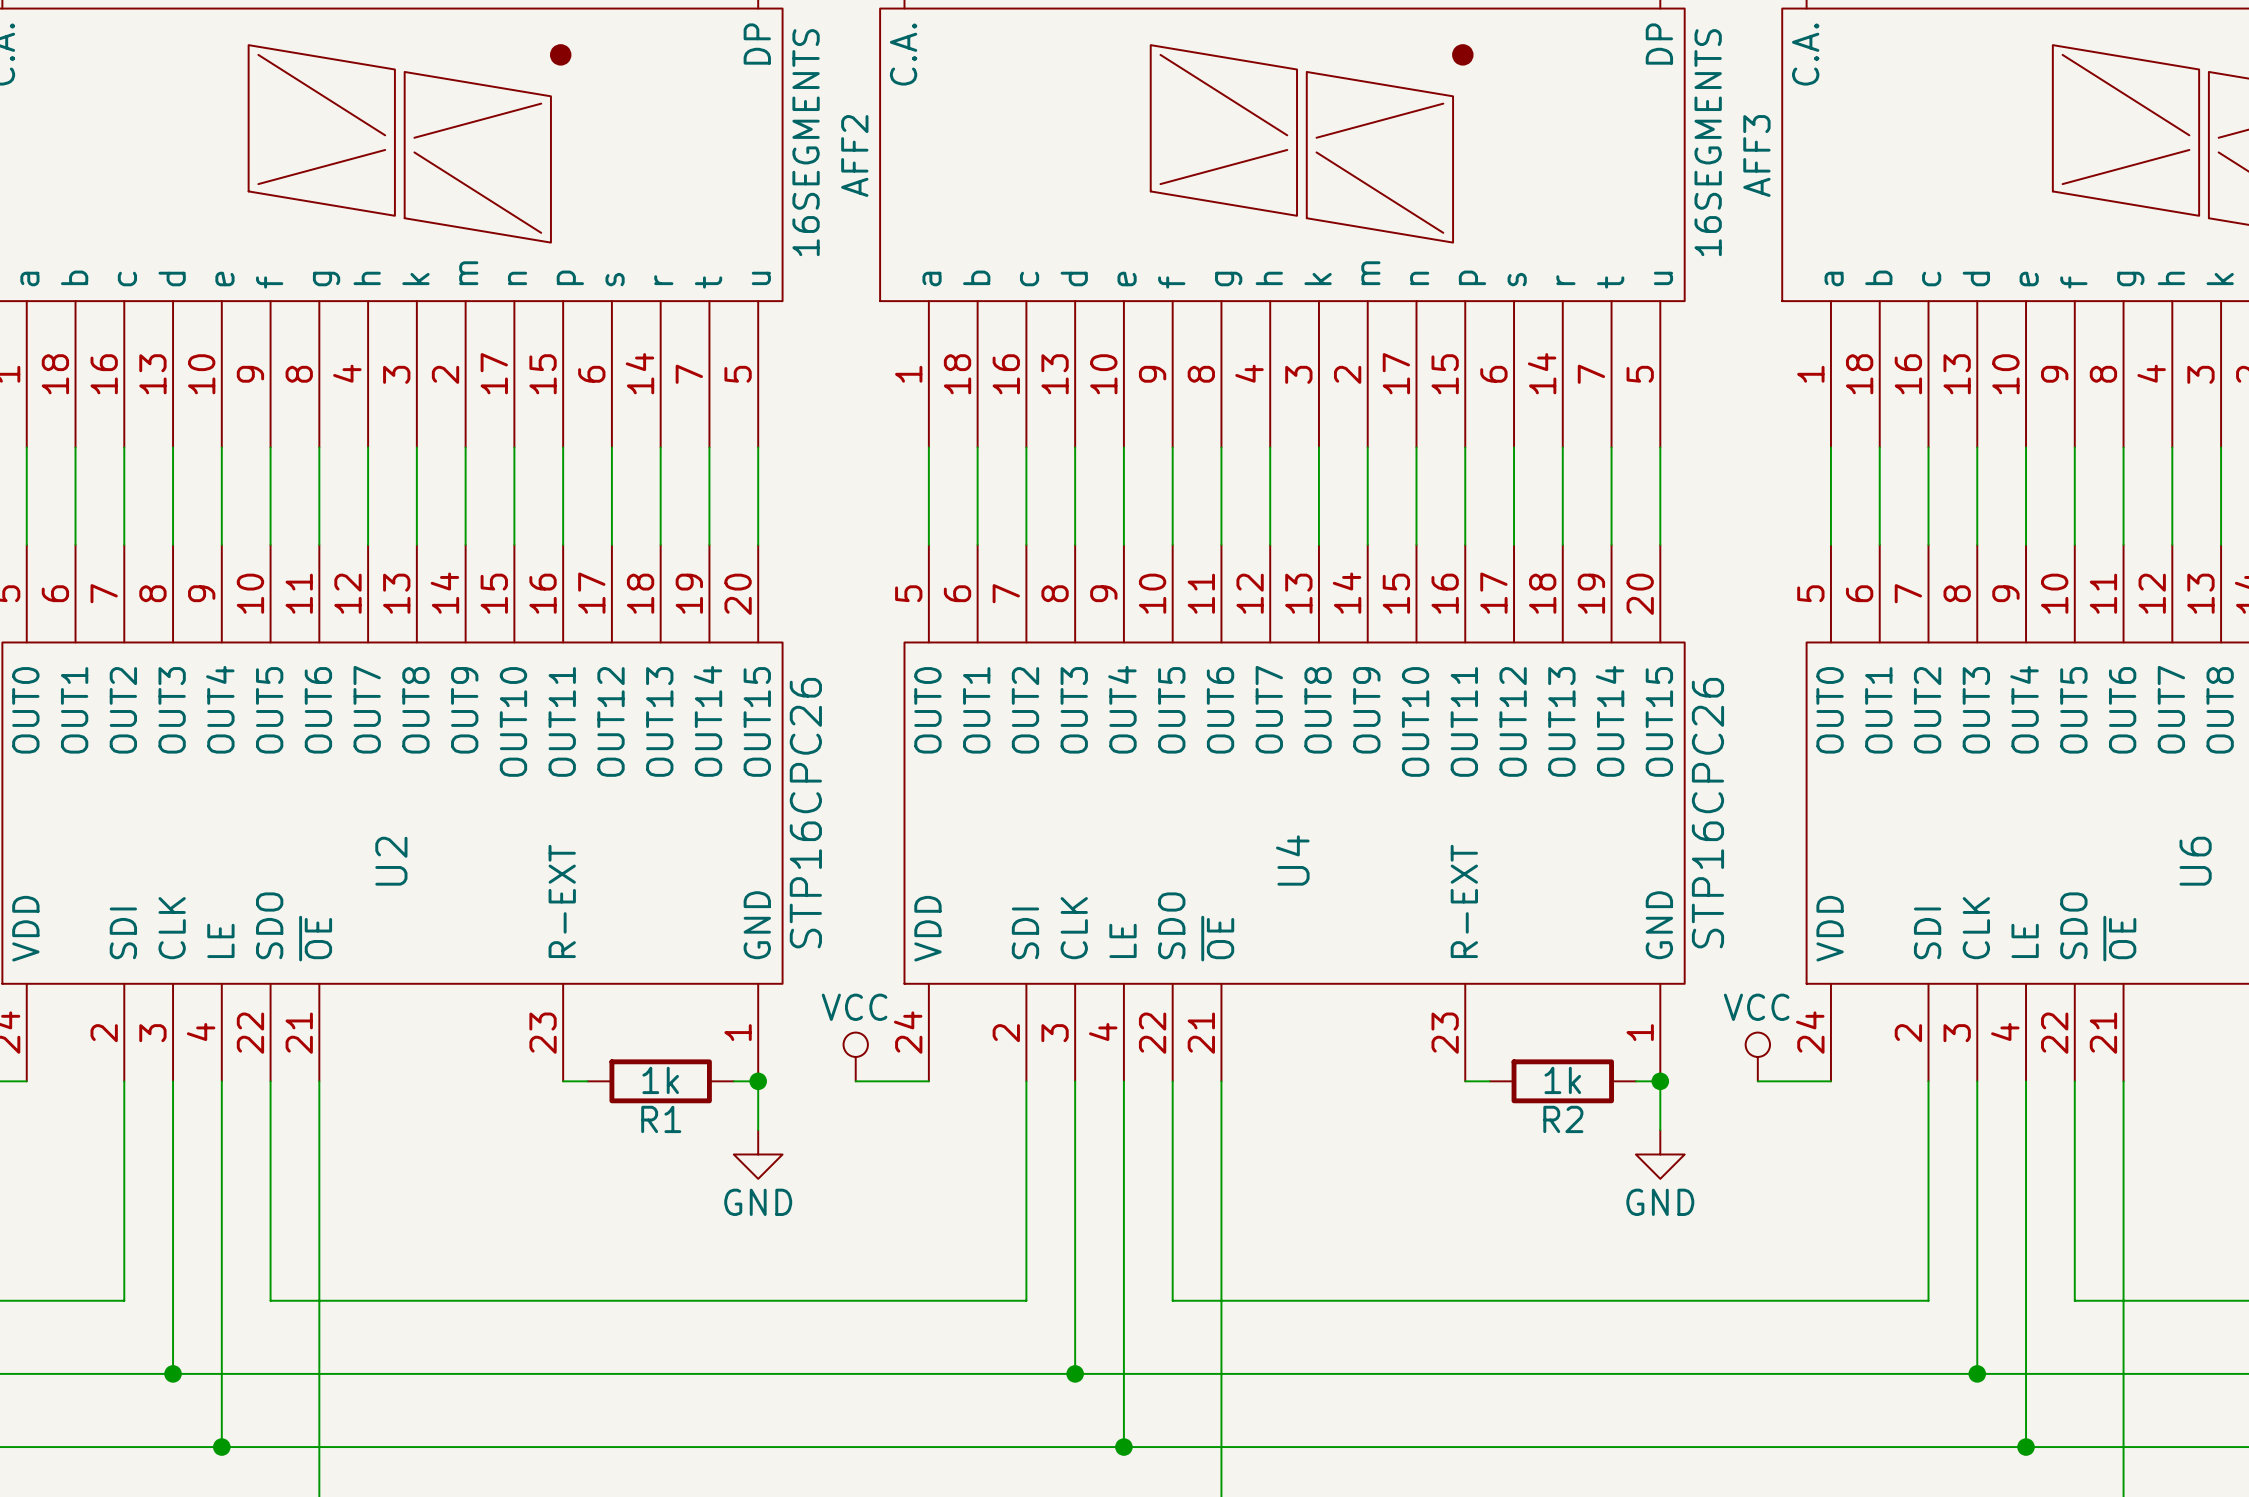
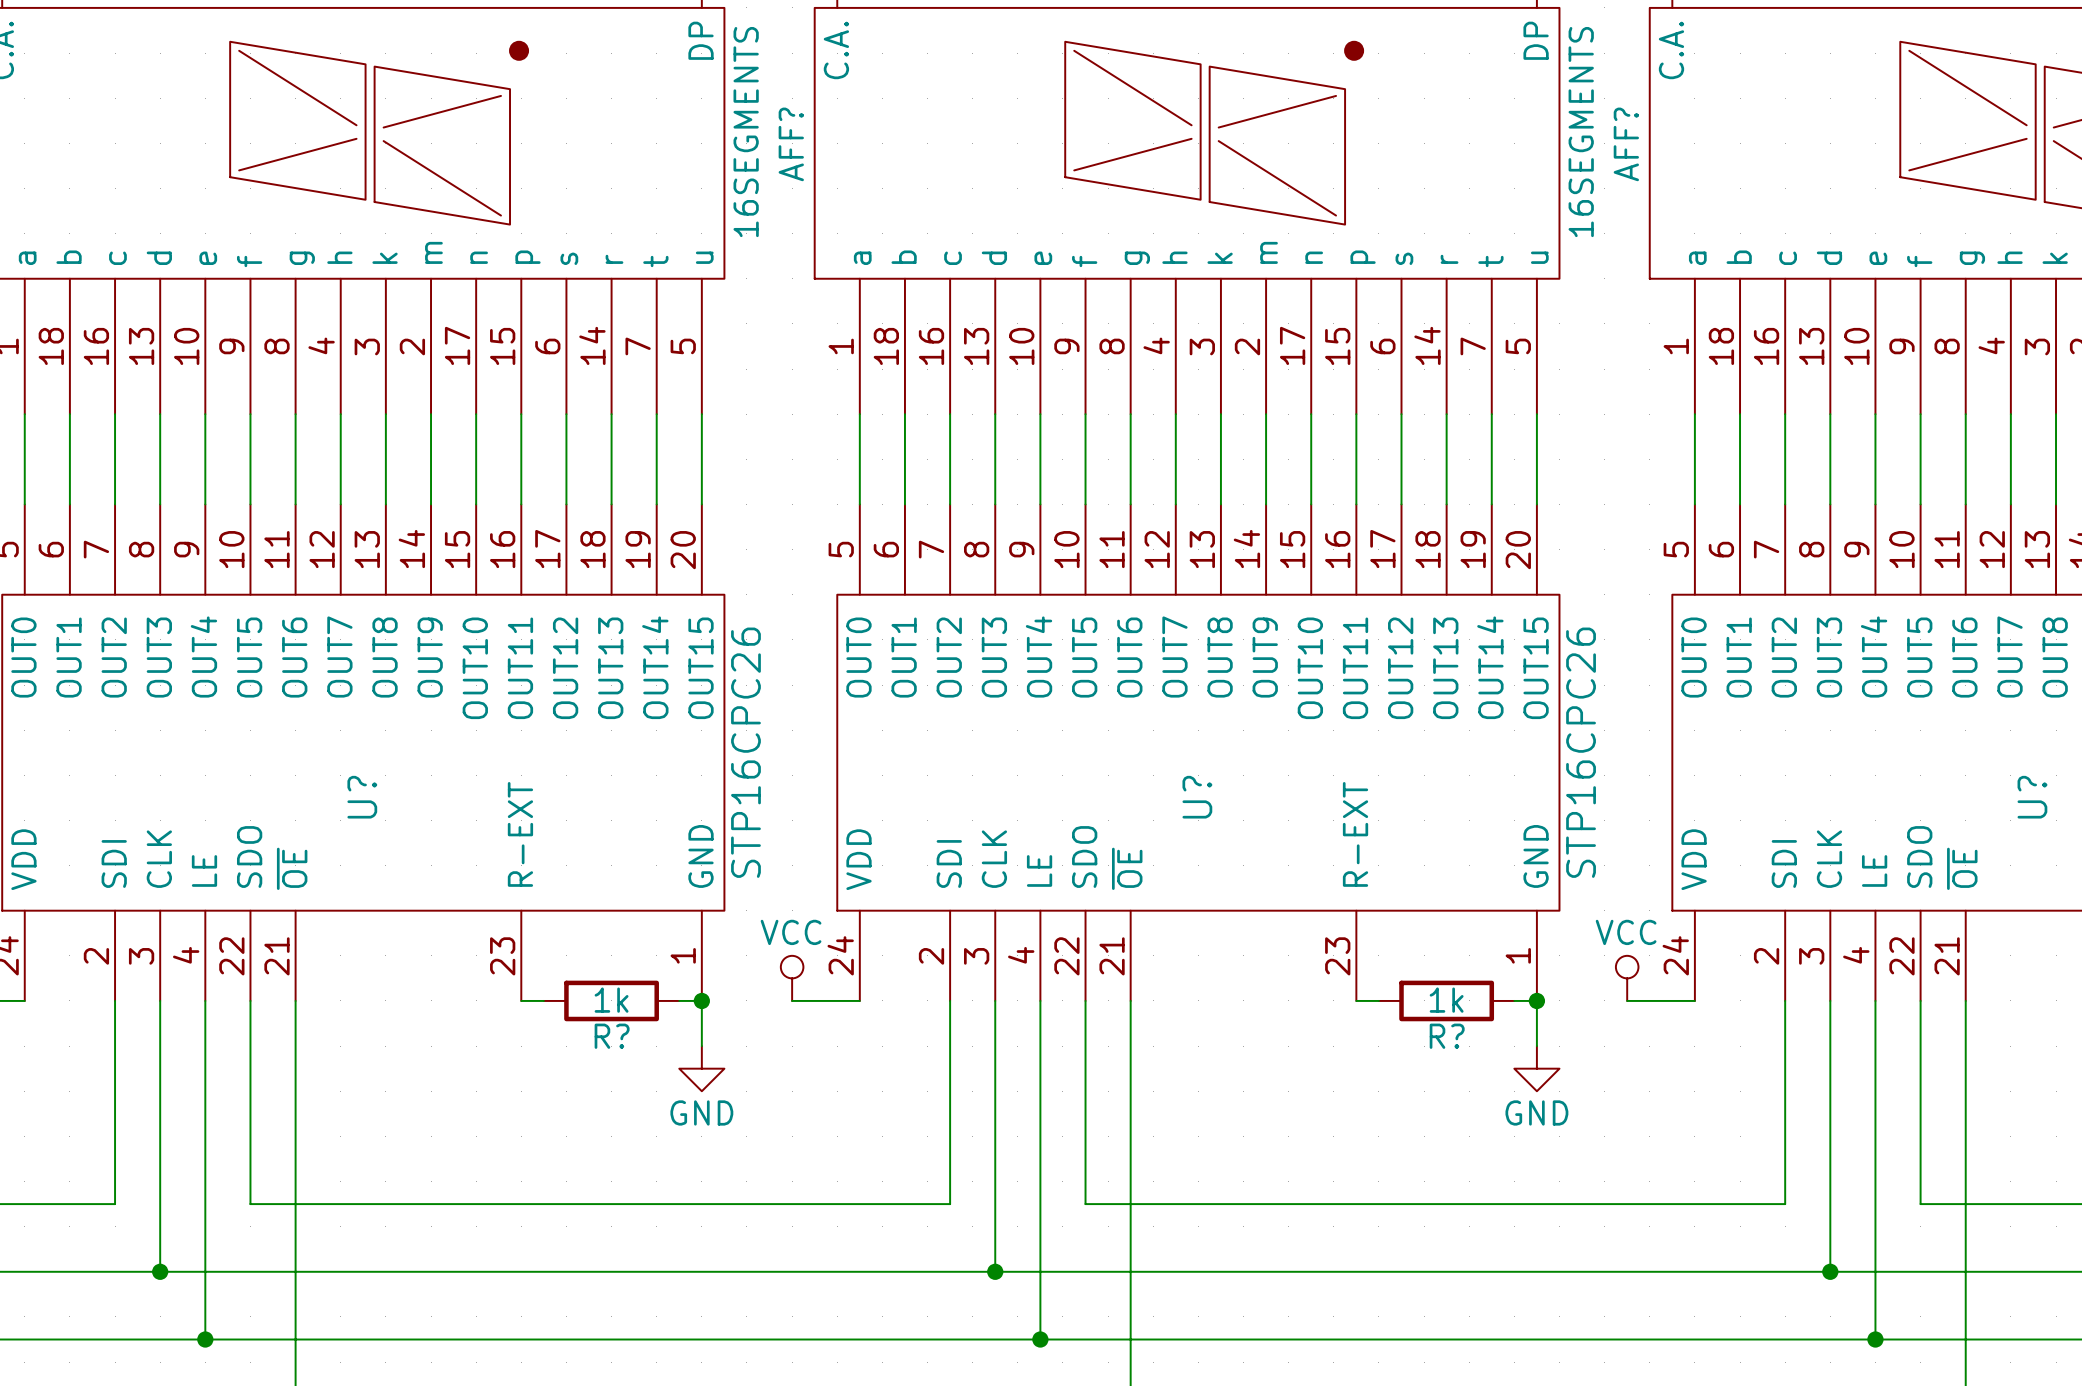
AFF2 name: AFF2 (854, 156) -> AFF? (791, 144)
AFF3 name: AFF3 (1756, 156) -> AFF? (1626, 144)
U4 name: U4 (1292, 860) -> U? (1197, 797)
U2 name: U2 (391, 861) -> U? (362, 797)
U6 name: U6 (2195, 861) -> U? (2032, 797)
R1 name: R1 (661, 1119) -> R? (612, 1036)
R2 name: R2 (1563, 1119) -> R? (1447, 1036)

